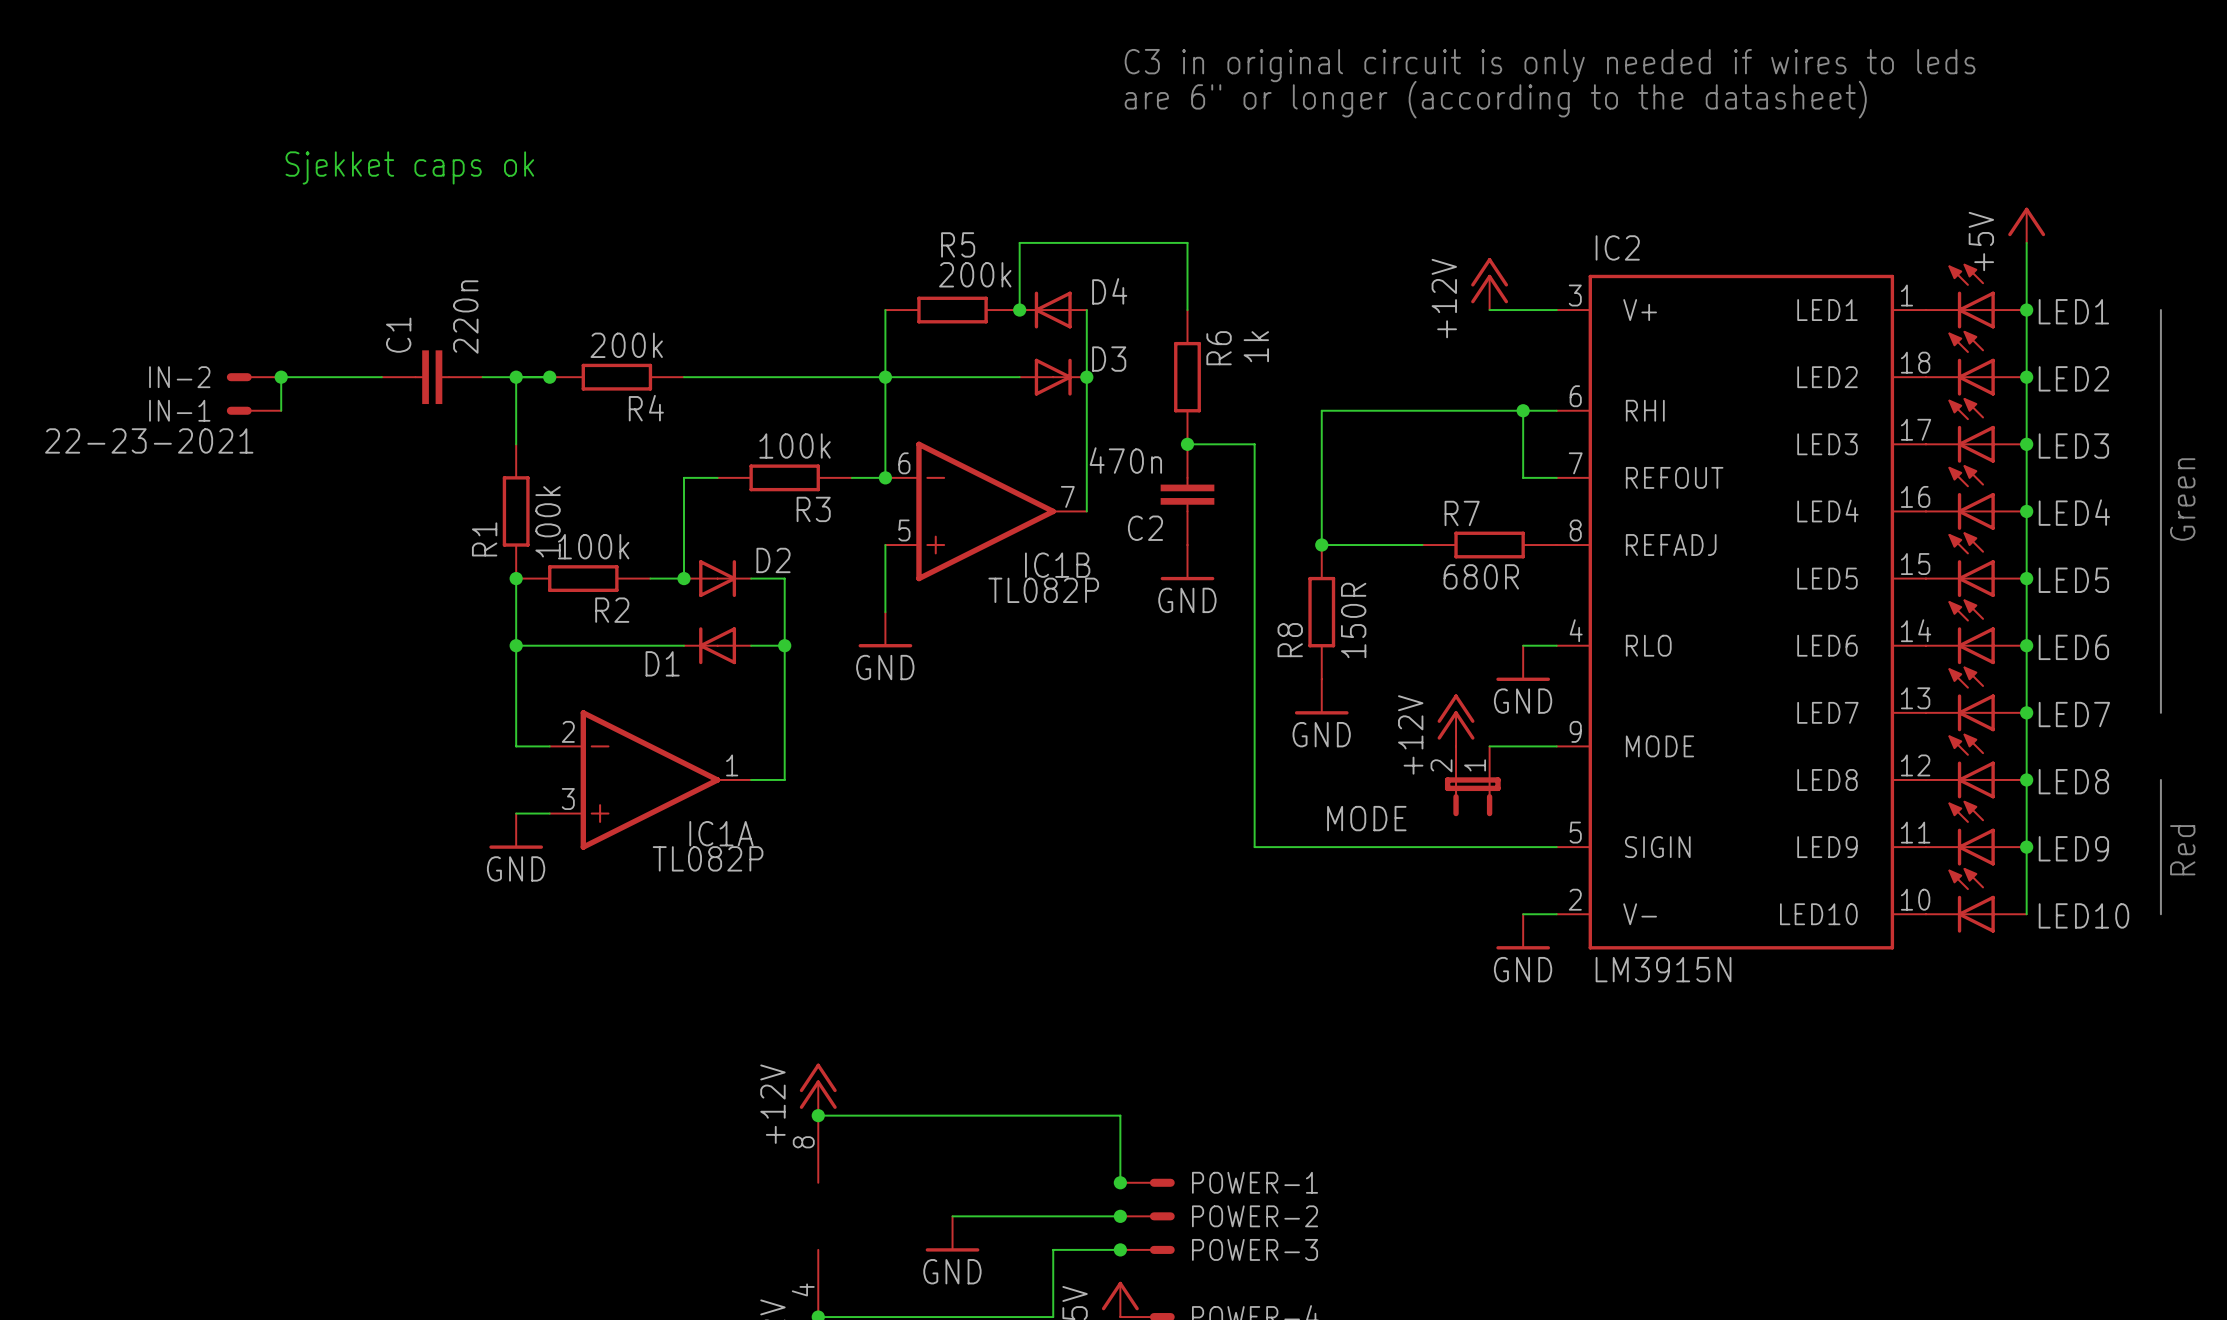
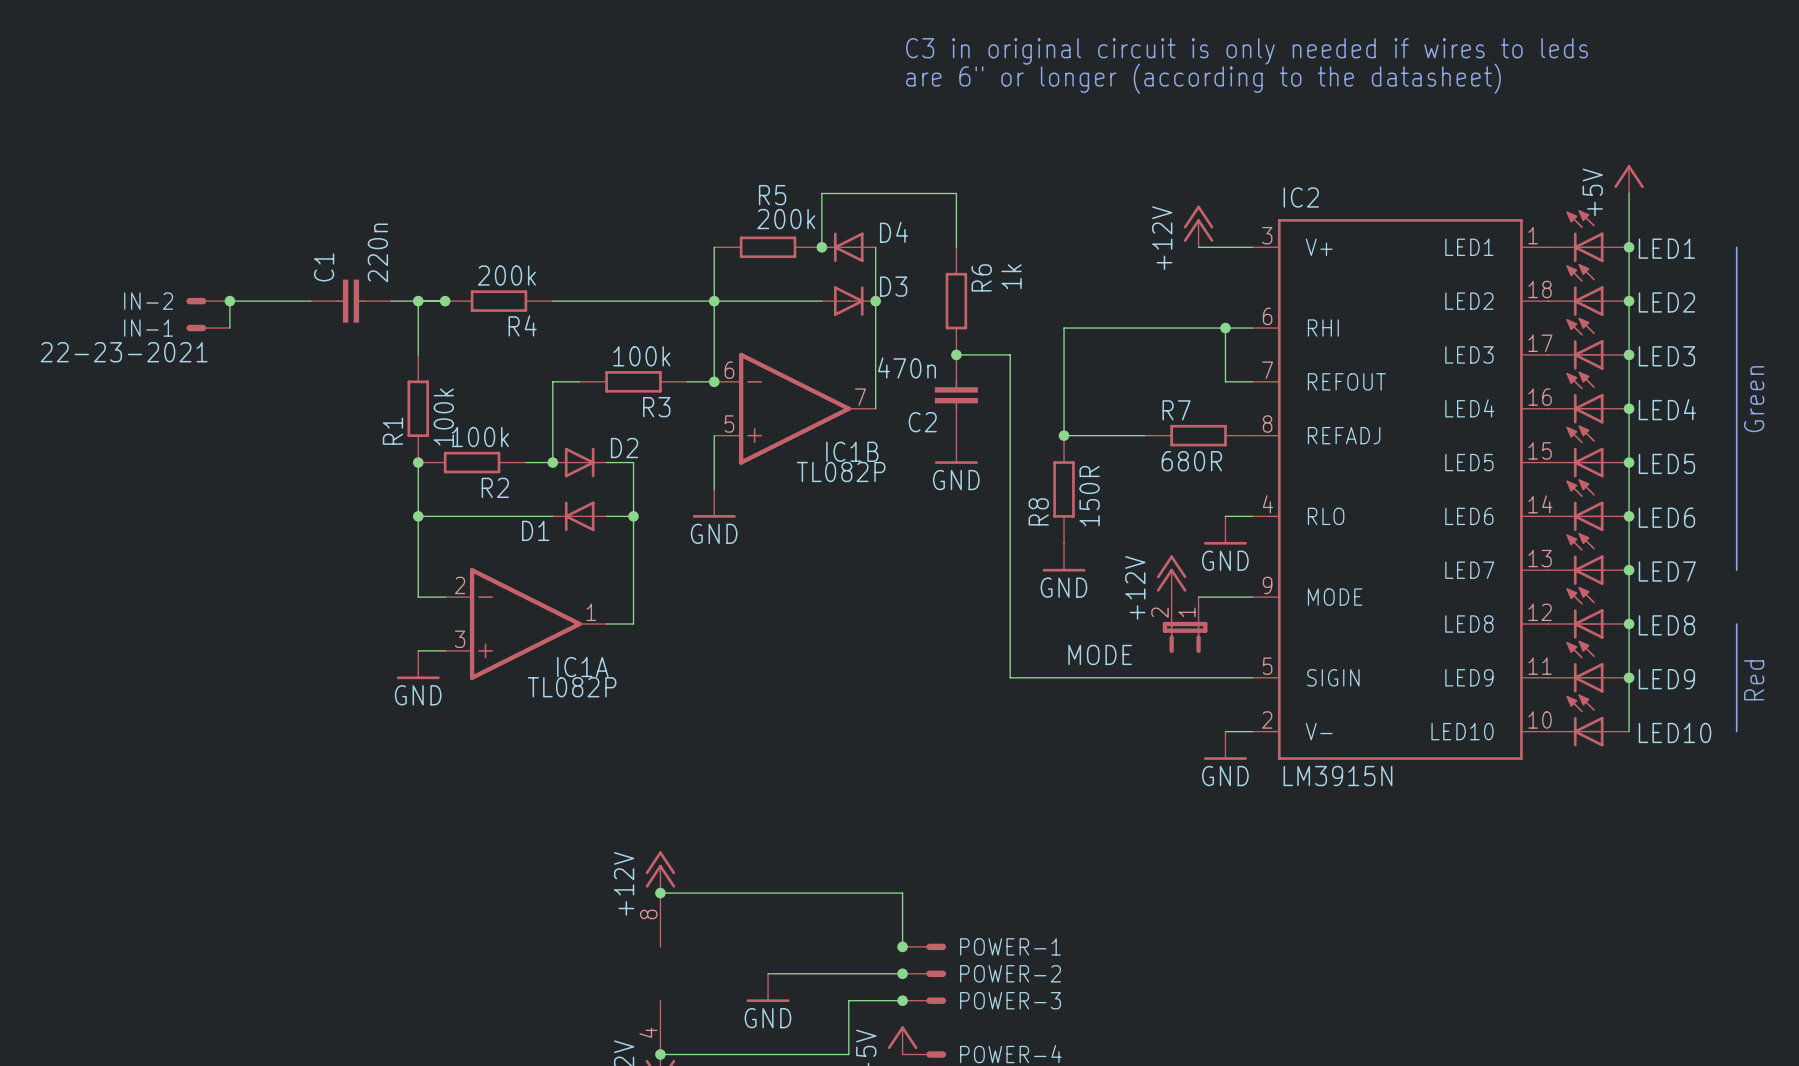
text: Sjekket caps ok (409, 167) -> none

